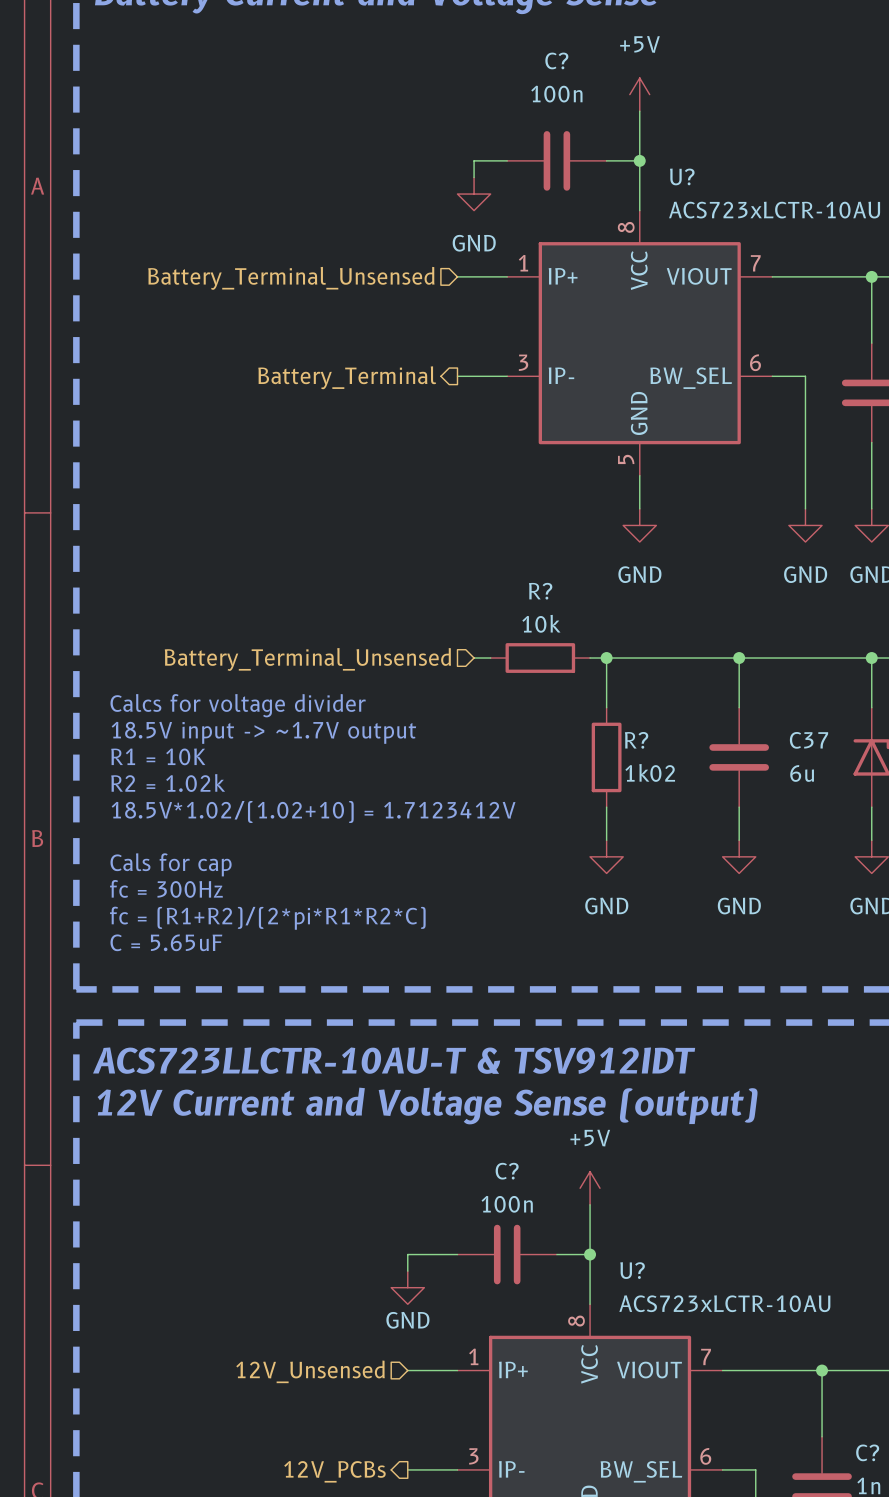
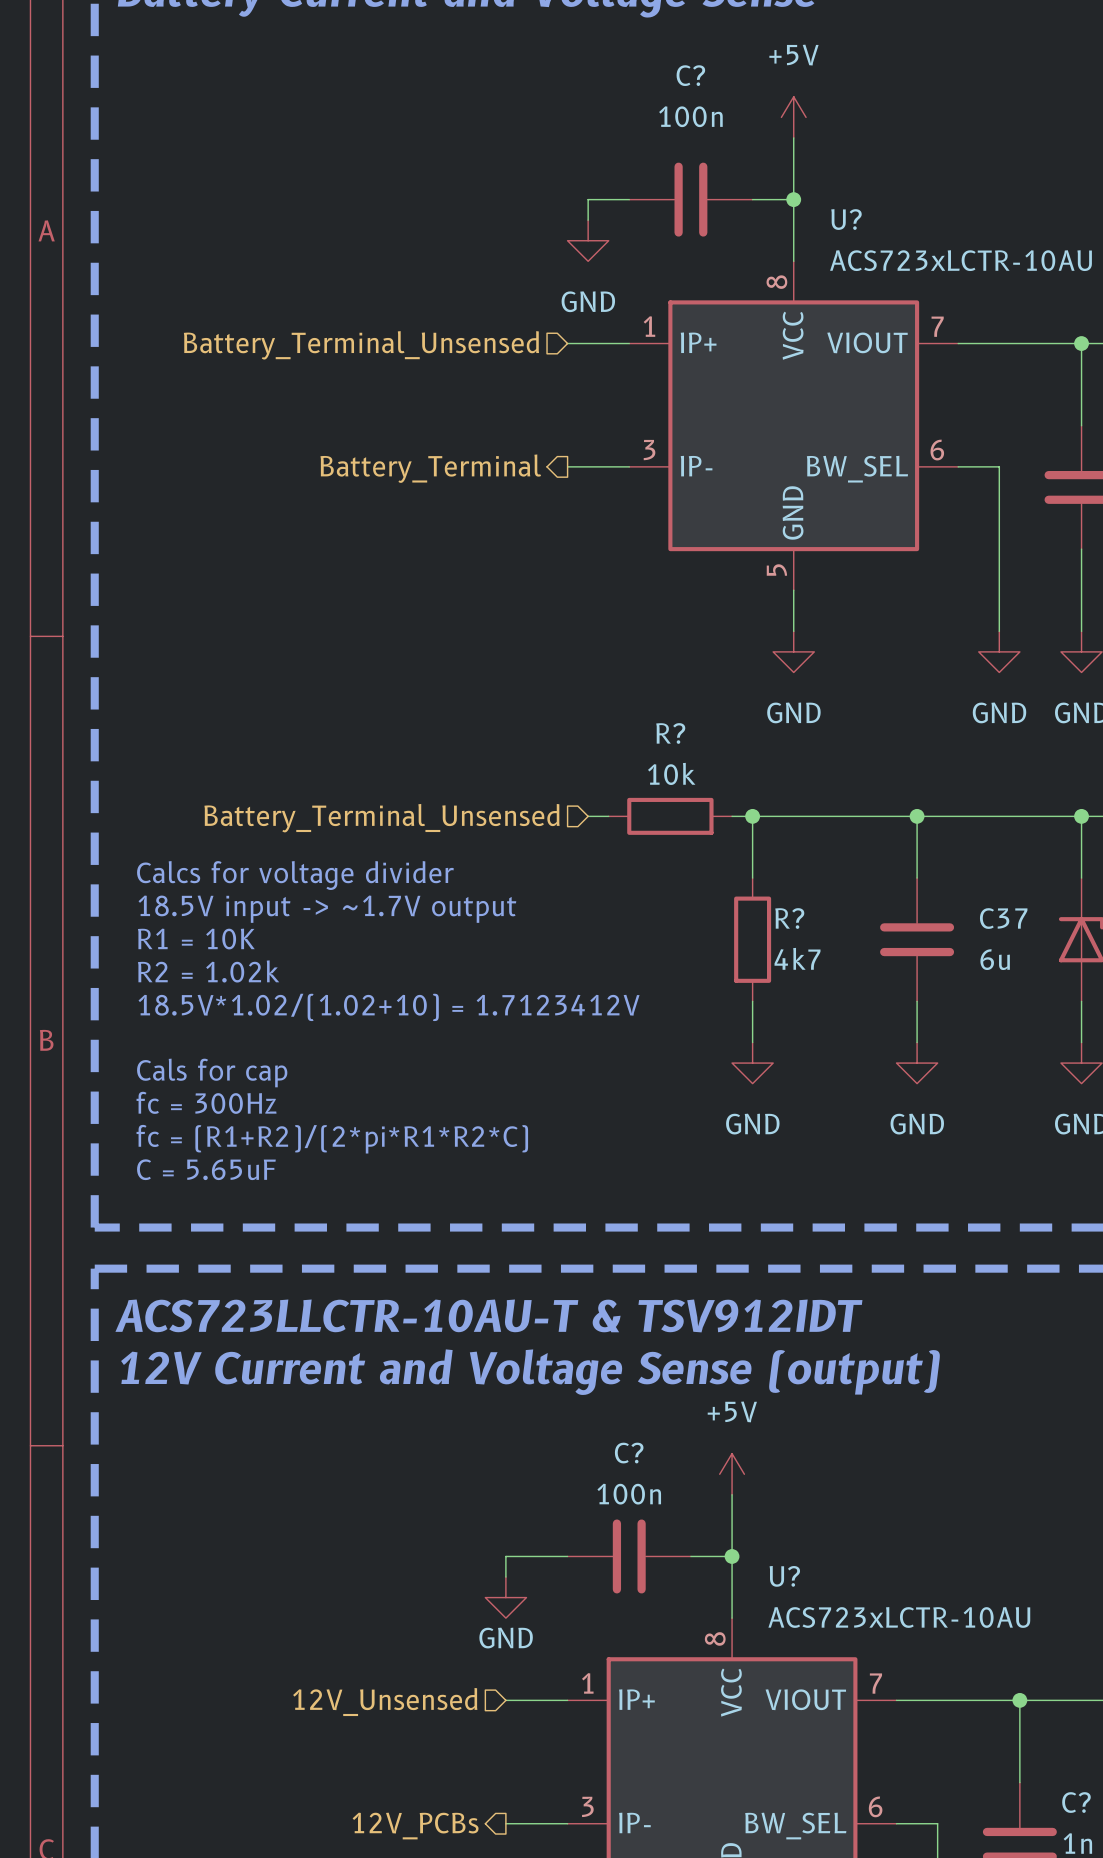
R? value: 1k02 (650, 772) -> 4k7 (797, 958)

